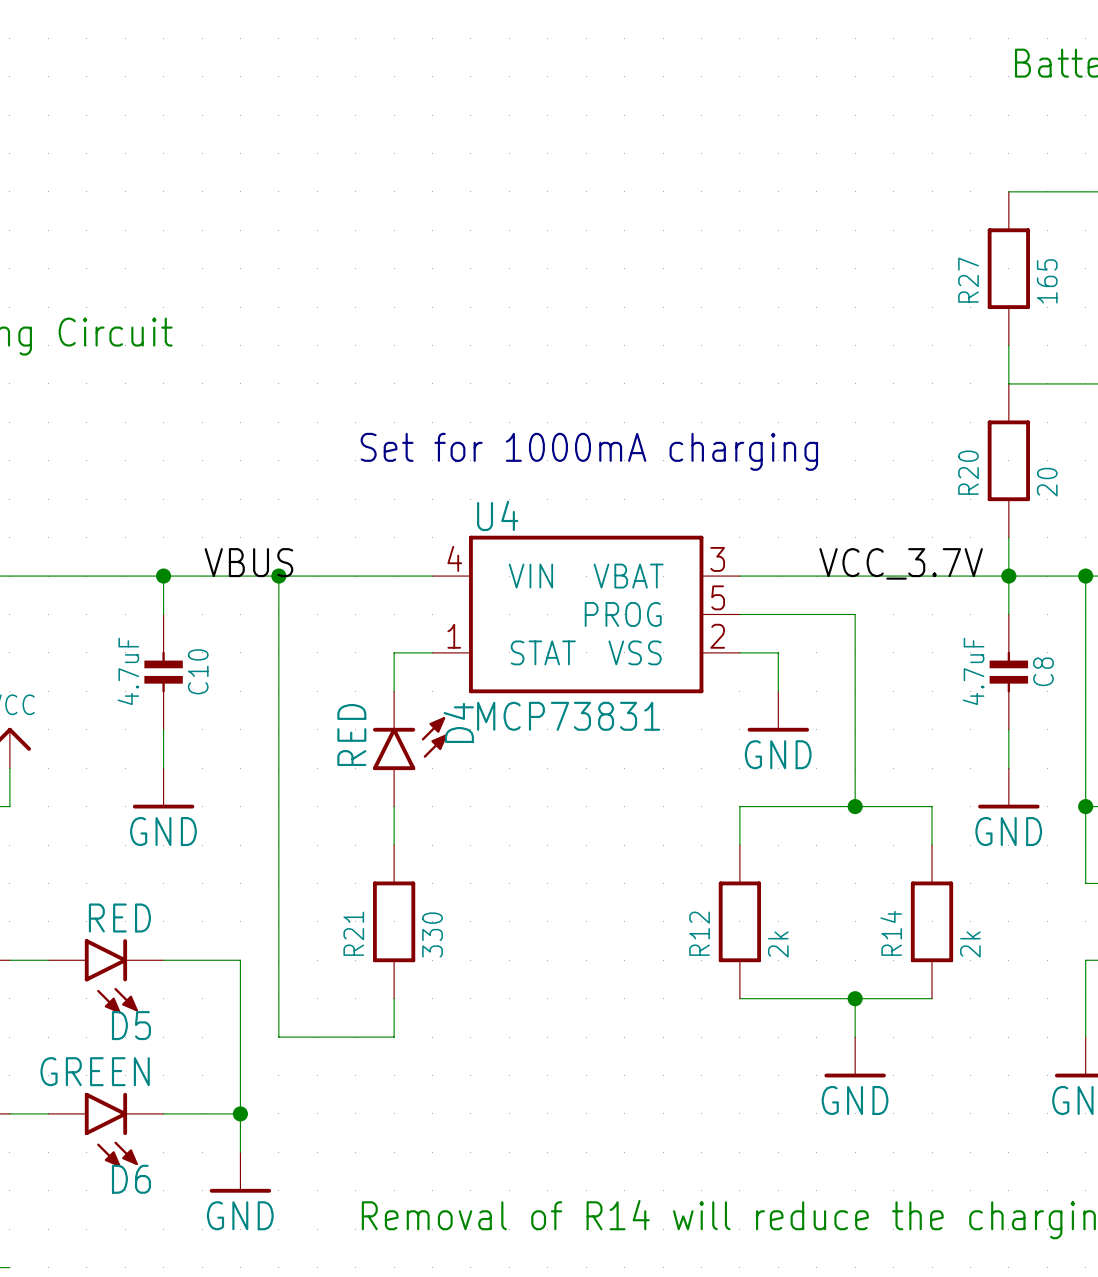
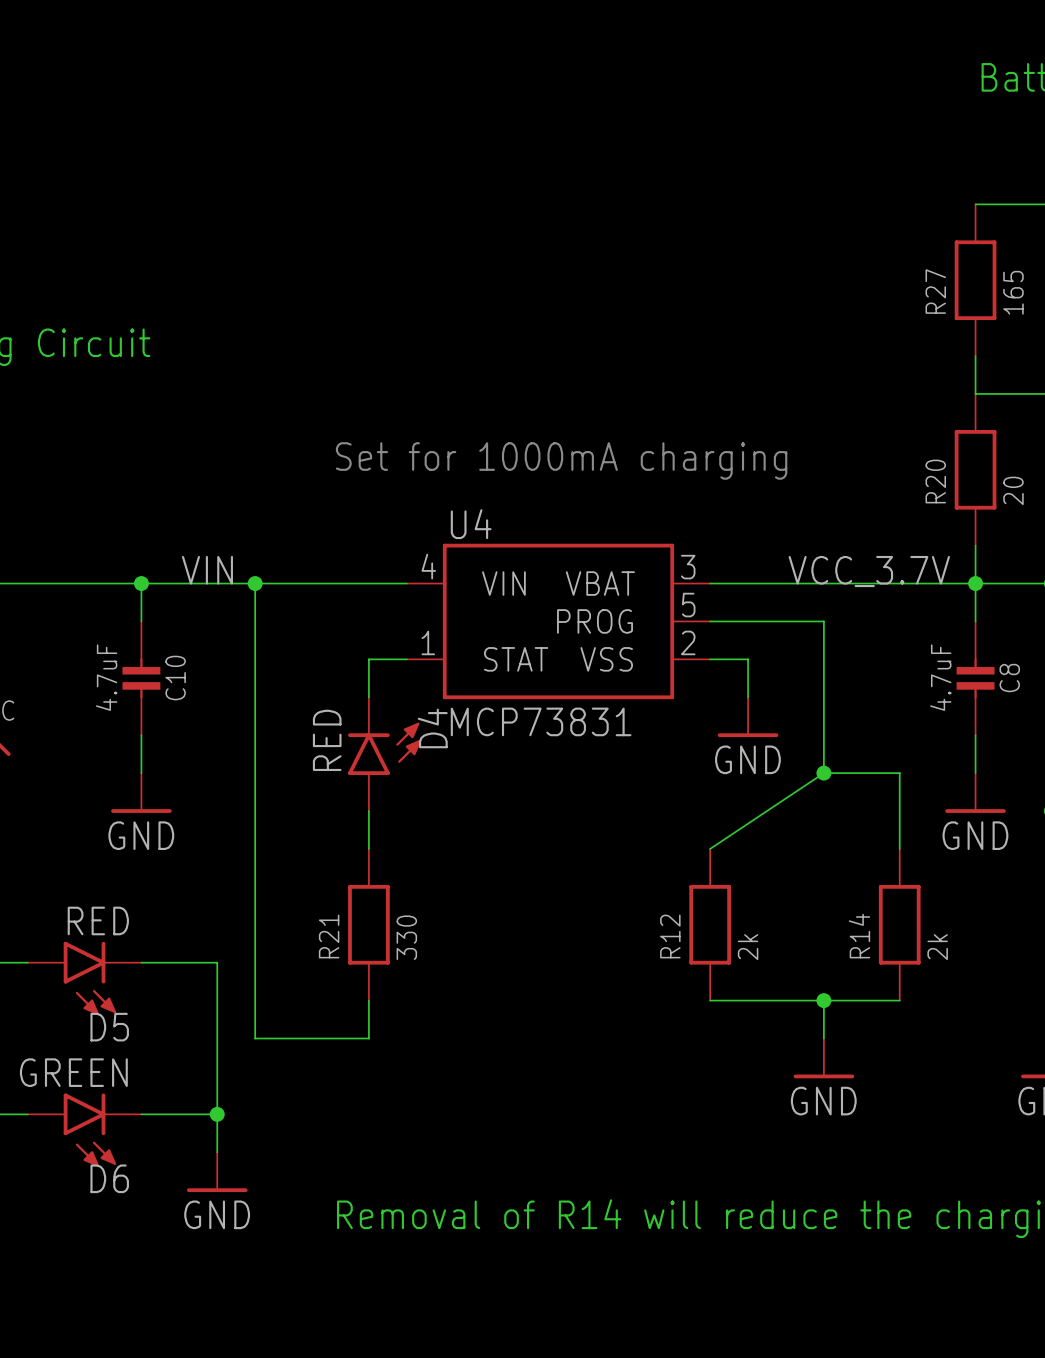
label: VBUS (248, 562) -> VIN (207, 570)
wire: (855, 768) (855, 806) -> none
junction position: (855, 806) -> (823, 773)
wire: (932, 806) (739, 806) (739, 845) -> (899, 811) (899, 773) (823, 773) (710, 848)

